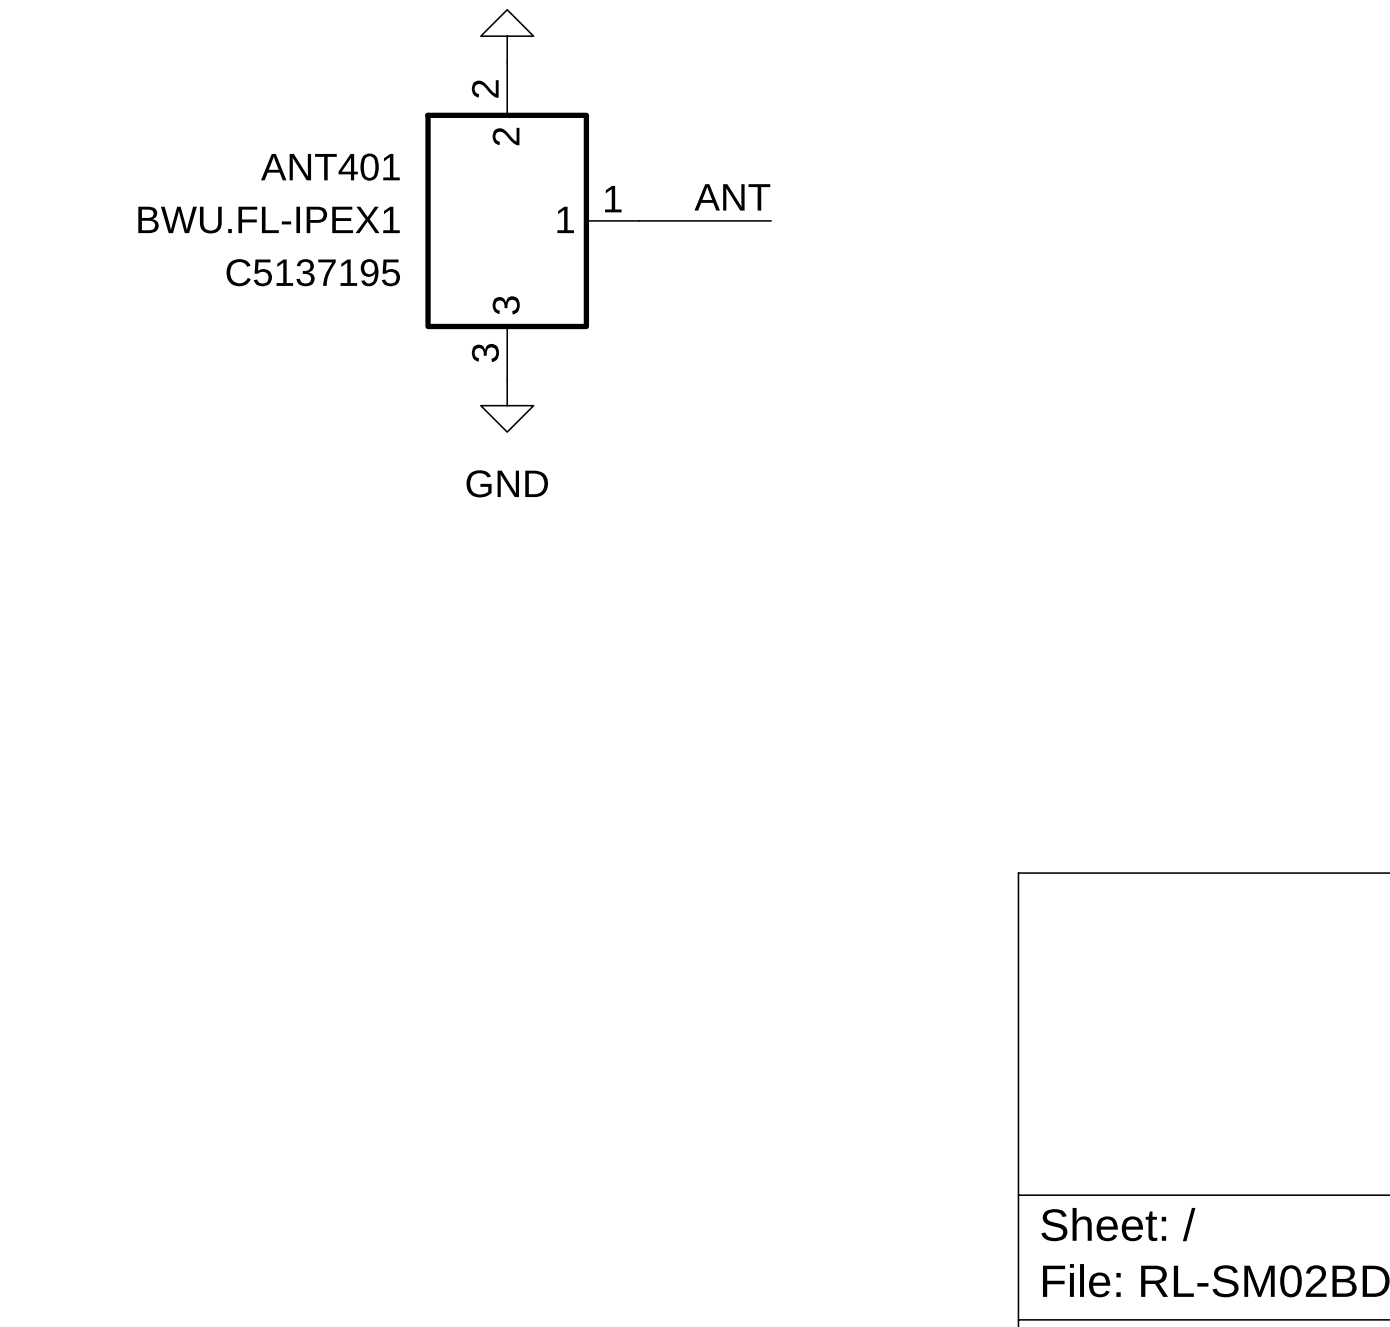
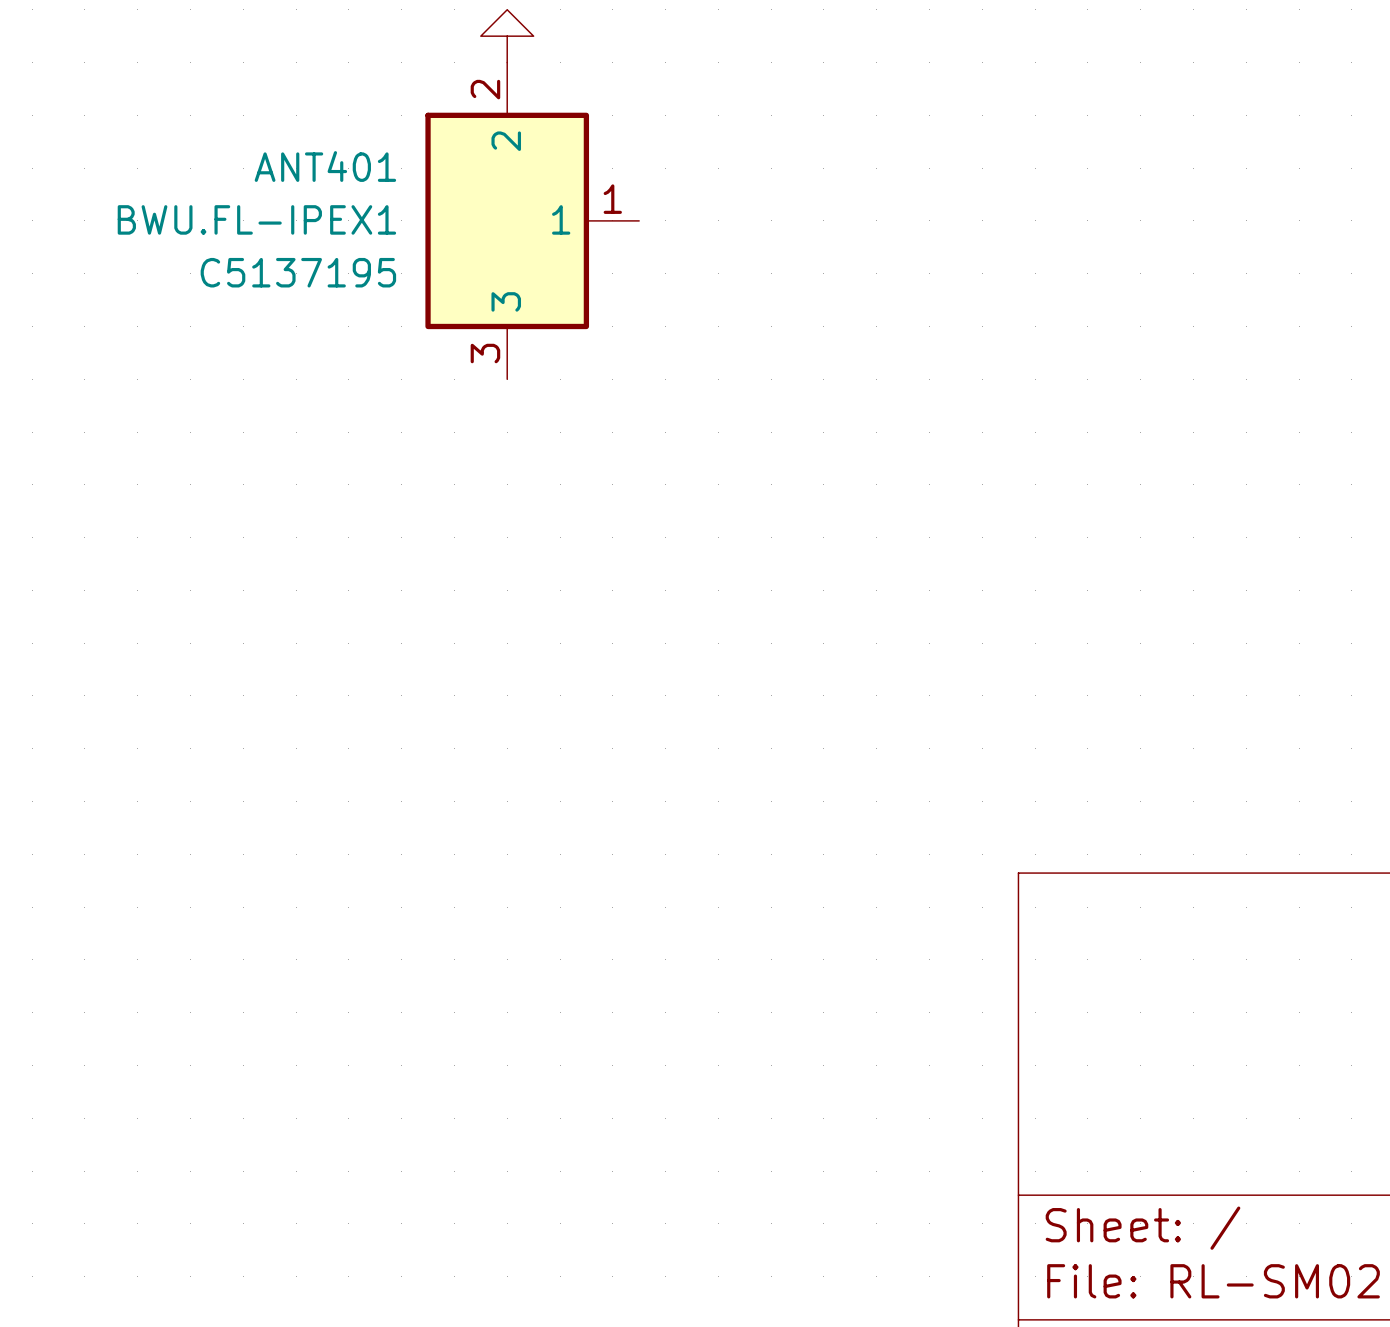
label: ANT (732, 197) -> none
wire: (639, 220) (771, 220) -> none
power symbol: GND (507, 405) -> none

